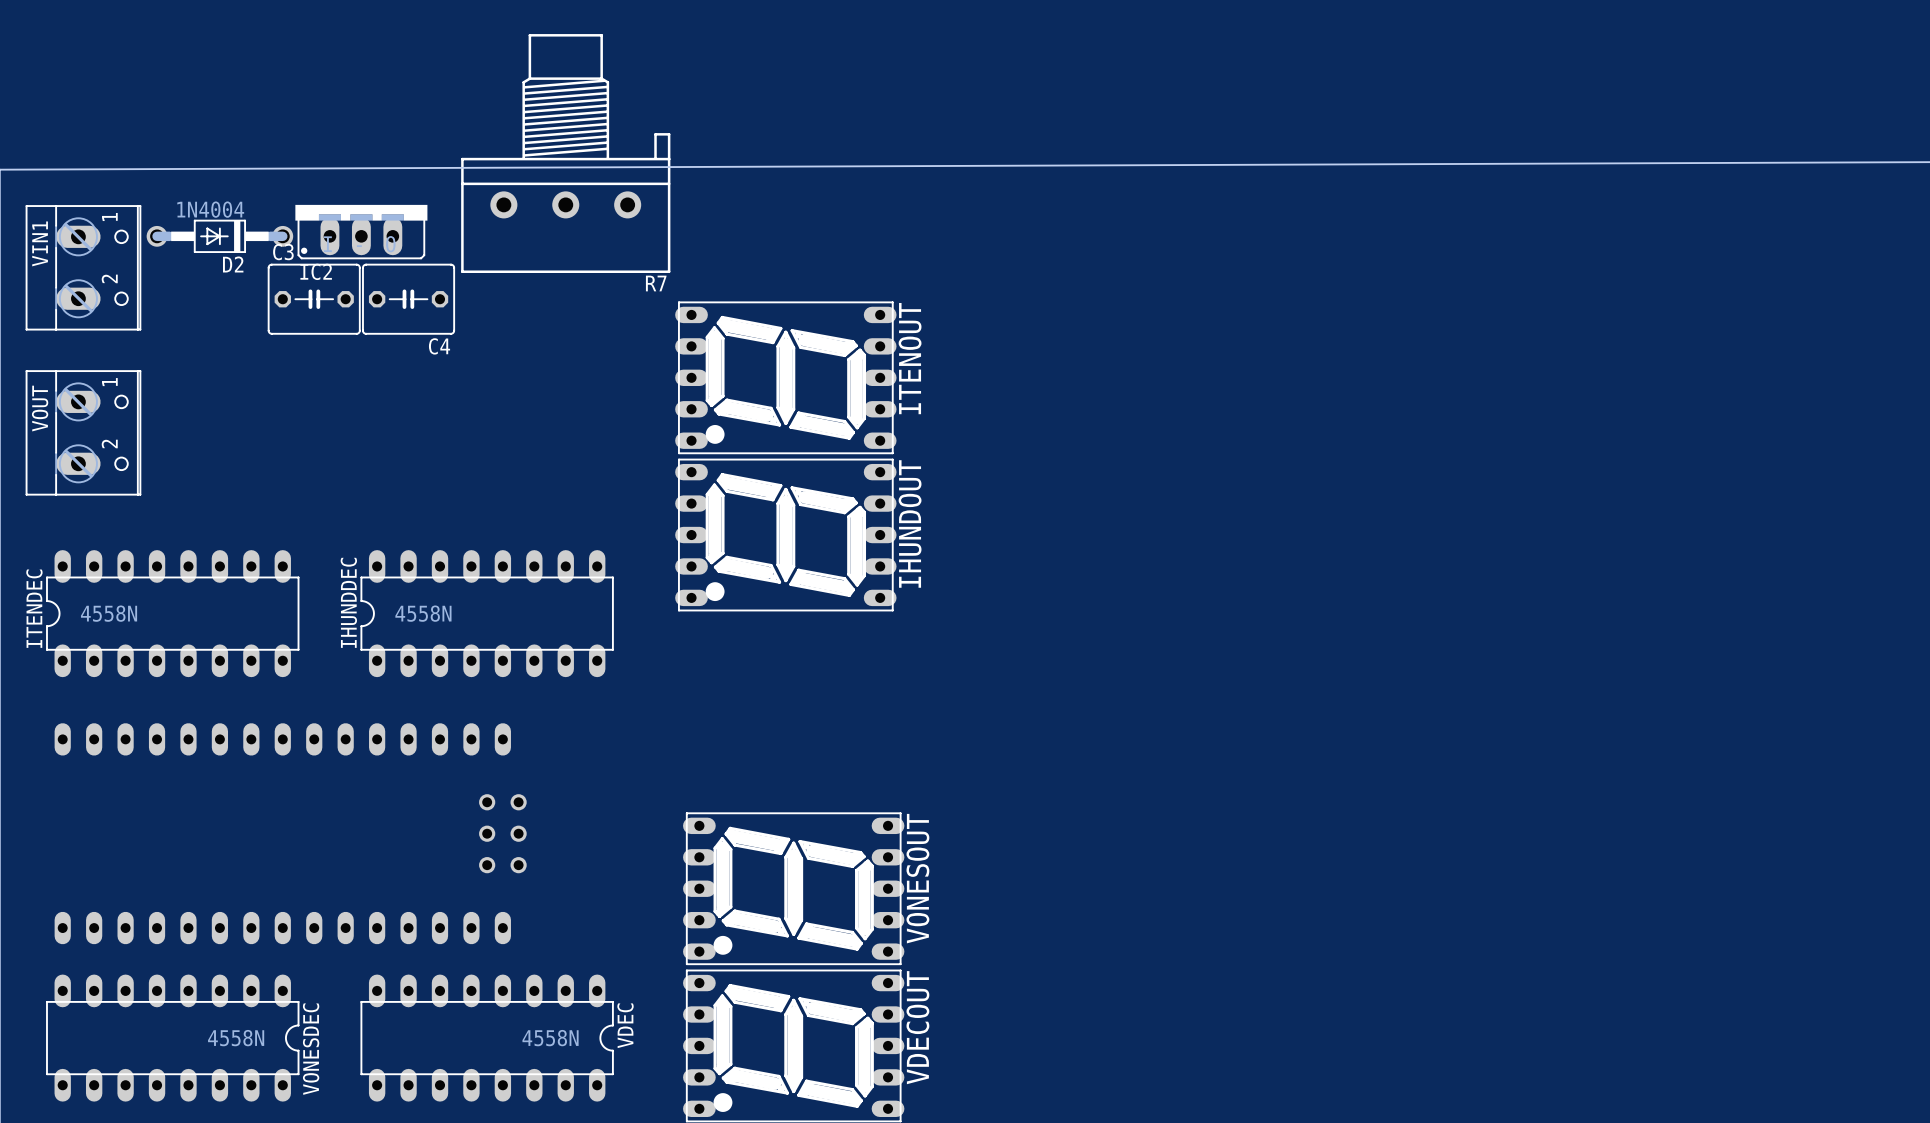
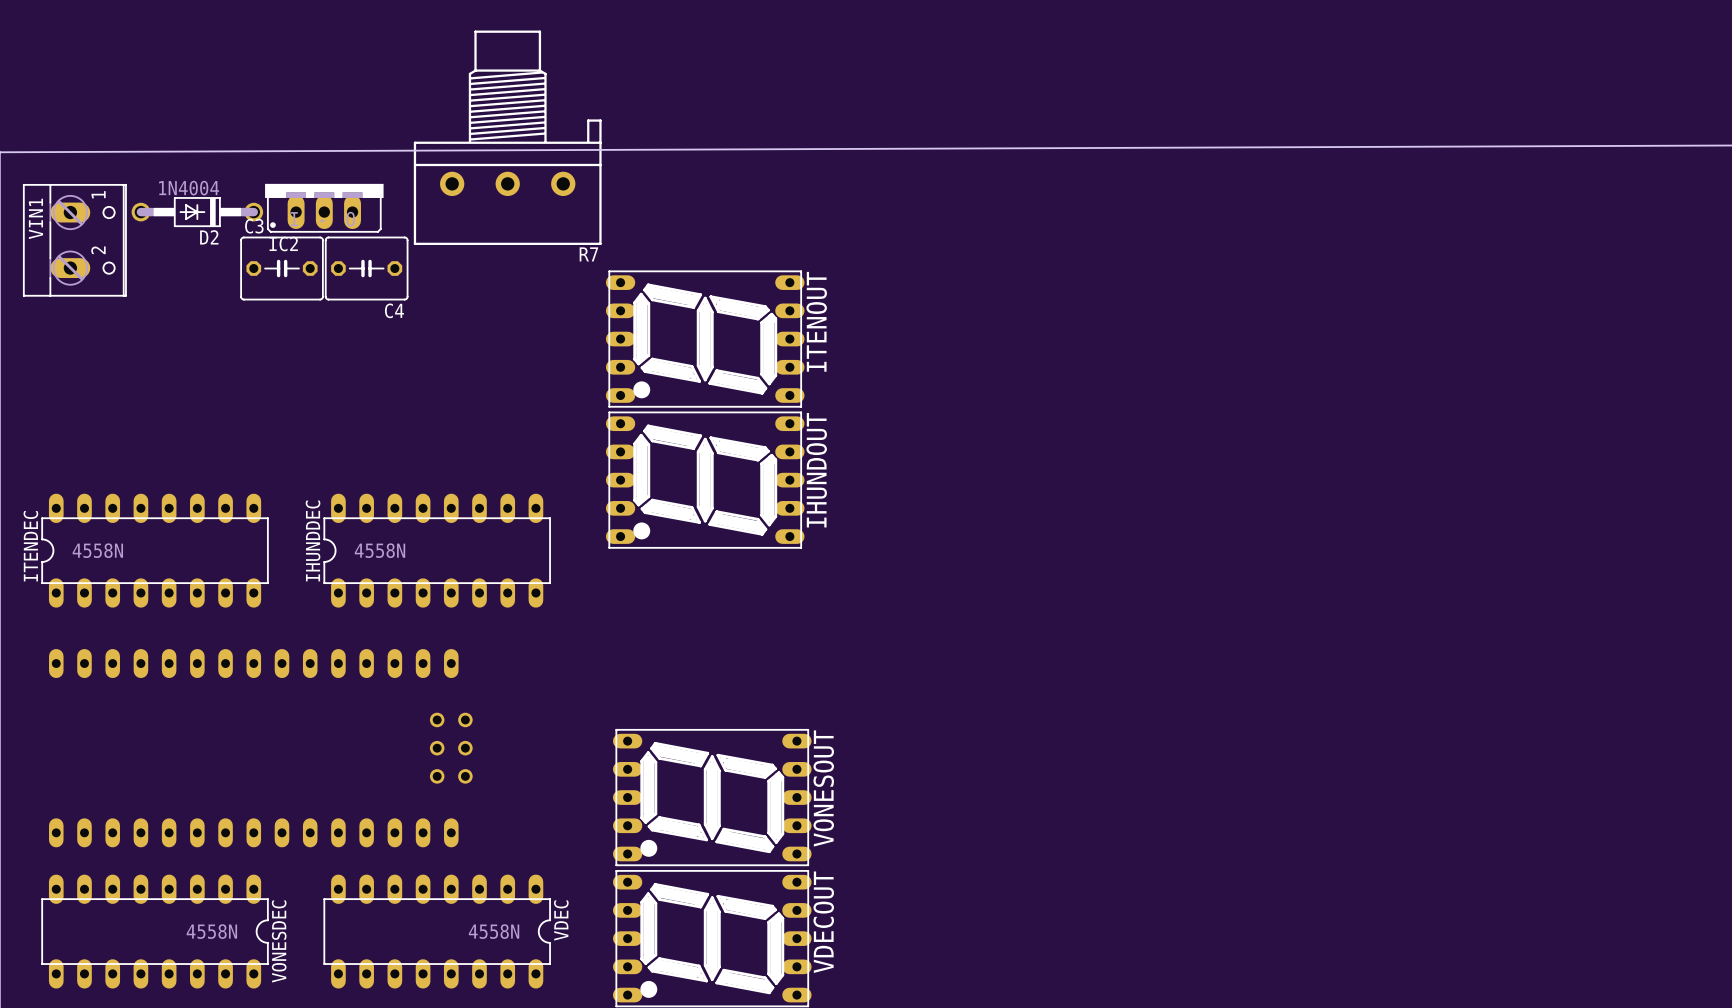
VOUT: (83, 432) -> none

